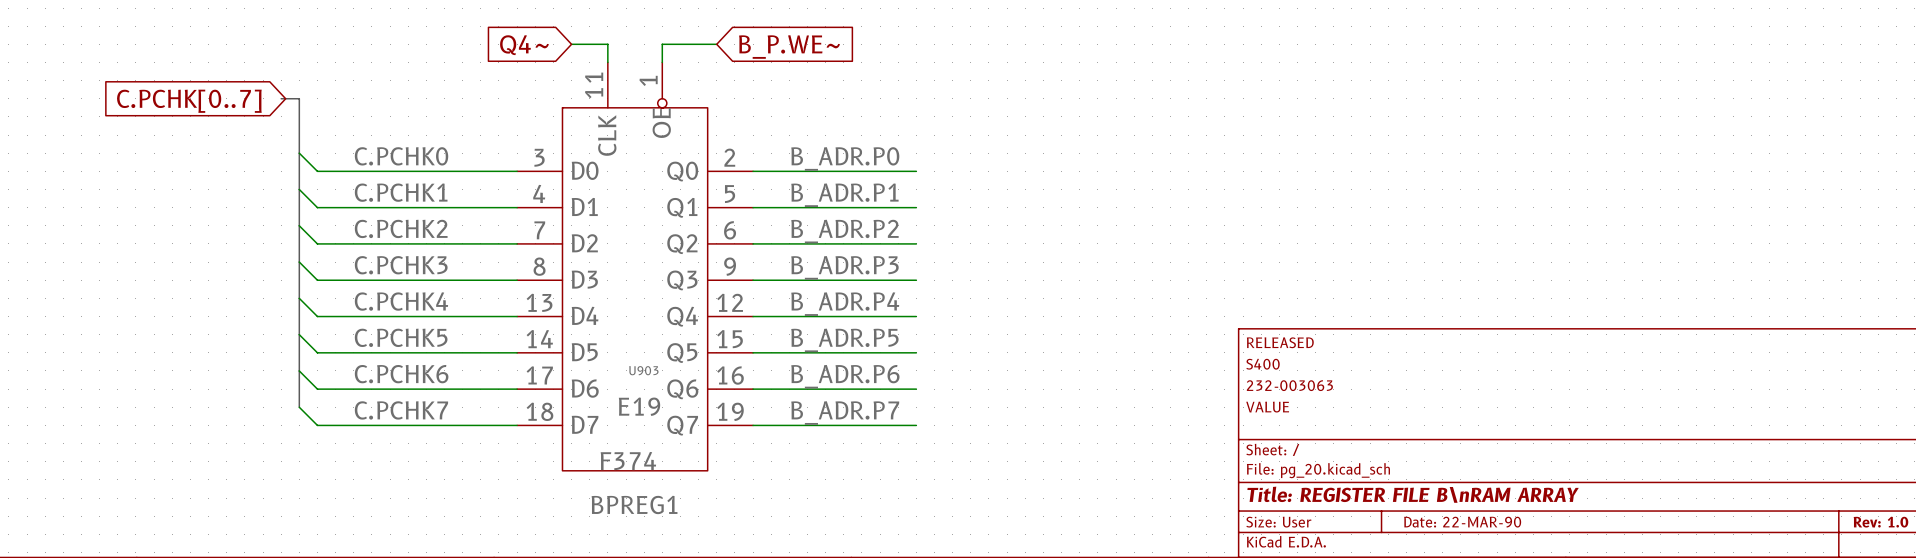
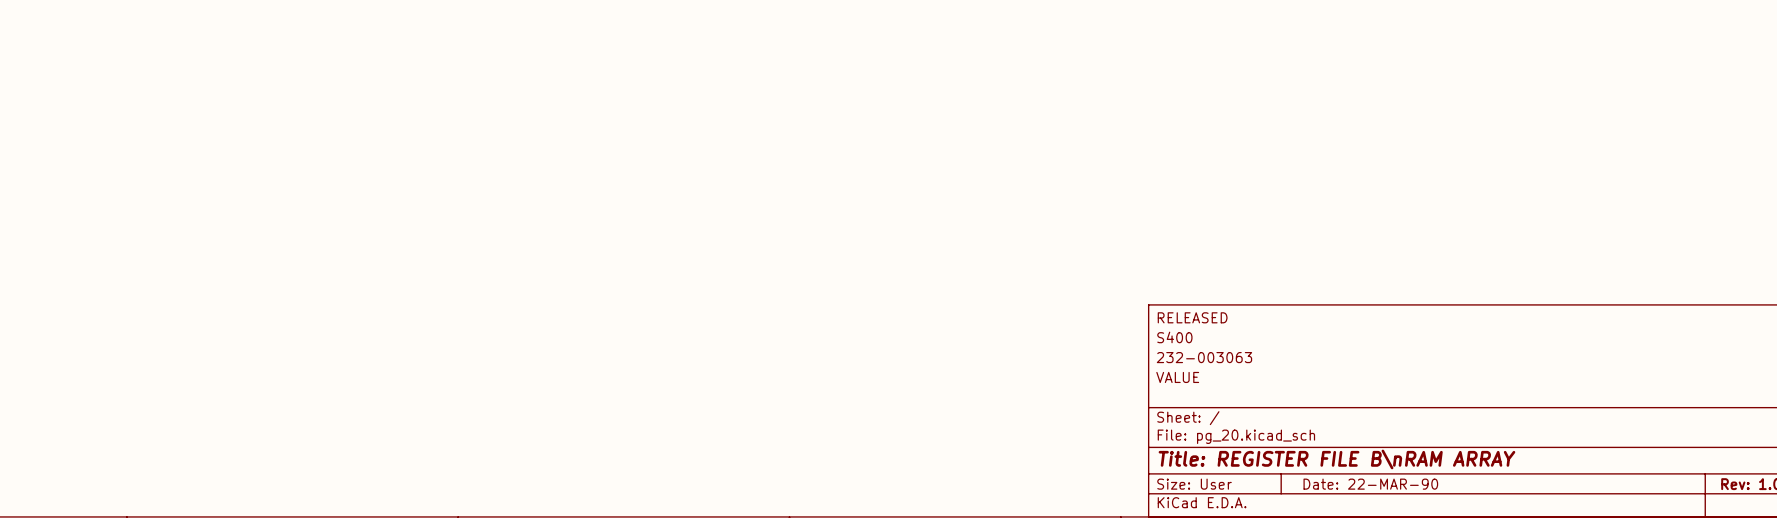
wire: (571, 44) (607, 44) (607, 62) -> none
wire: (716, 44) (662, 44) (662, 62) -> none
global label: Q4~ (524, 45) -> none
global label: B_P.WE~ (789, 47) -> none
bus: (281, 98) (299, 98) (299, 407) -> none
global label: C.PCHK[0..7] (189, 101) -> none
wire: (299, 153) (317, 171) (517, 171) -> none
label: C.PCHK0 (401, 156) -> none
label: B_ADR.P0 (845, 158) -> none
wire: (753, 171) (916, 171) -> none
wire: (299, 189) (317, 207) (517, 207) -> none
label: C.PCHK1 (401, 192) -> none
label: B_ADR.P1 (844, 195) -> none
wire: (753, 207) (916, 207) -> none
wire: (299, 225) (317, 243) (517, 243) -> none
label: C.PCHK2 (401, 228) -> none
label: B_ADR.P2 (844, 231) -> none
wire: (753, 243) (916, 243) -> none
wire: (299, 262) (317, 280) (517, 280) -> none
label: C.PCHK3 (401, 265) -> none
U903: F374 (635, 266) -> none
label: B_ADR.P3 (844, 267) -> none
wire: (753, 280) (916, 280) -> none
wire: (299, 298) (317, 316) (517, 316) -> none
label: C.PCHK4 (401, 301) -> none
label: B_ADR.P4 (845, 304) -> none
wire: (753, 316) (916, 316) -> none
wire: (299, 334) (317, 352) (517, 352) -> none
label: C.PCHK5 (401, 337) -> none
label: B_ADR.P5 (844, 340) -> none
wire: (753, 352) (916, 352) -> none
wire: (299, 370) (317, 389) (517, 389) -> none
label: C.PCHK6 (401, 374) -> none
label: B_ADR.P6 (845, 376) -> none
wire: (753, 389) (916, 389) -> none
wire: (299, 407) (317, 425) (517, 425) -> none
label: C.PCHK7 (401, 410) -> none
label: B_ADR.P7 (845, 413) -> none
wire: (753, 425) (916, 425) -> none

